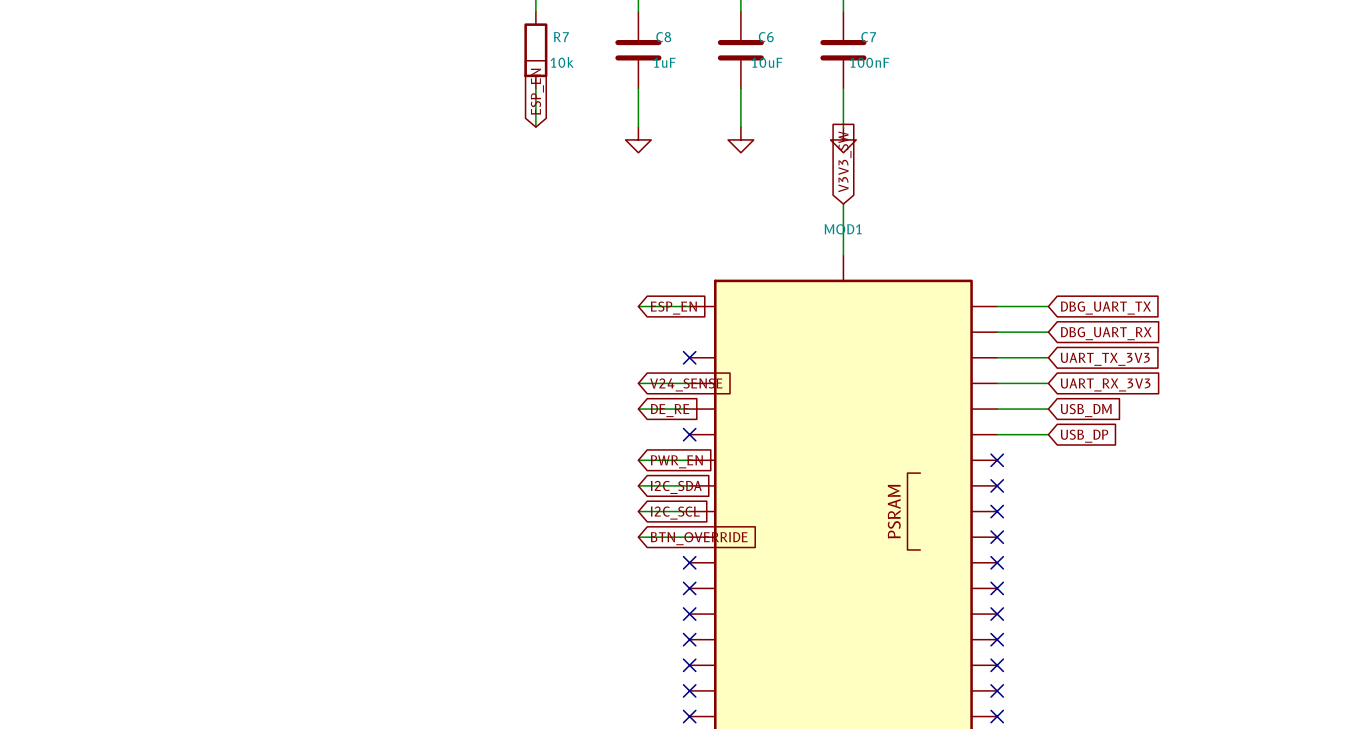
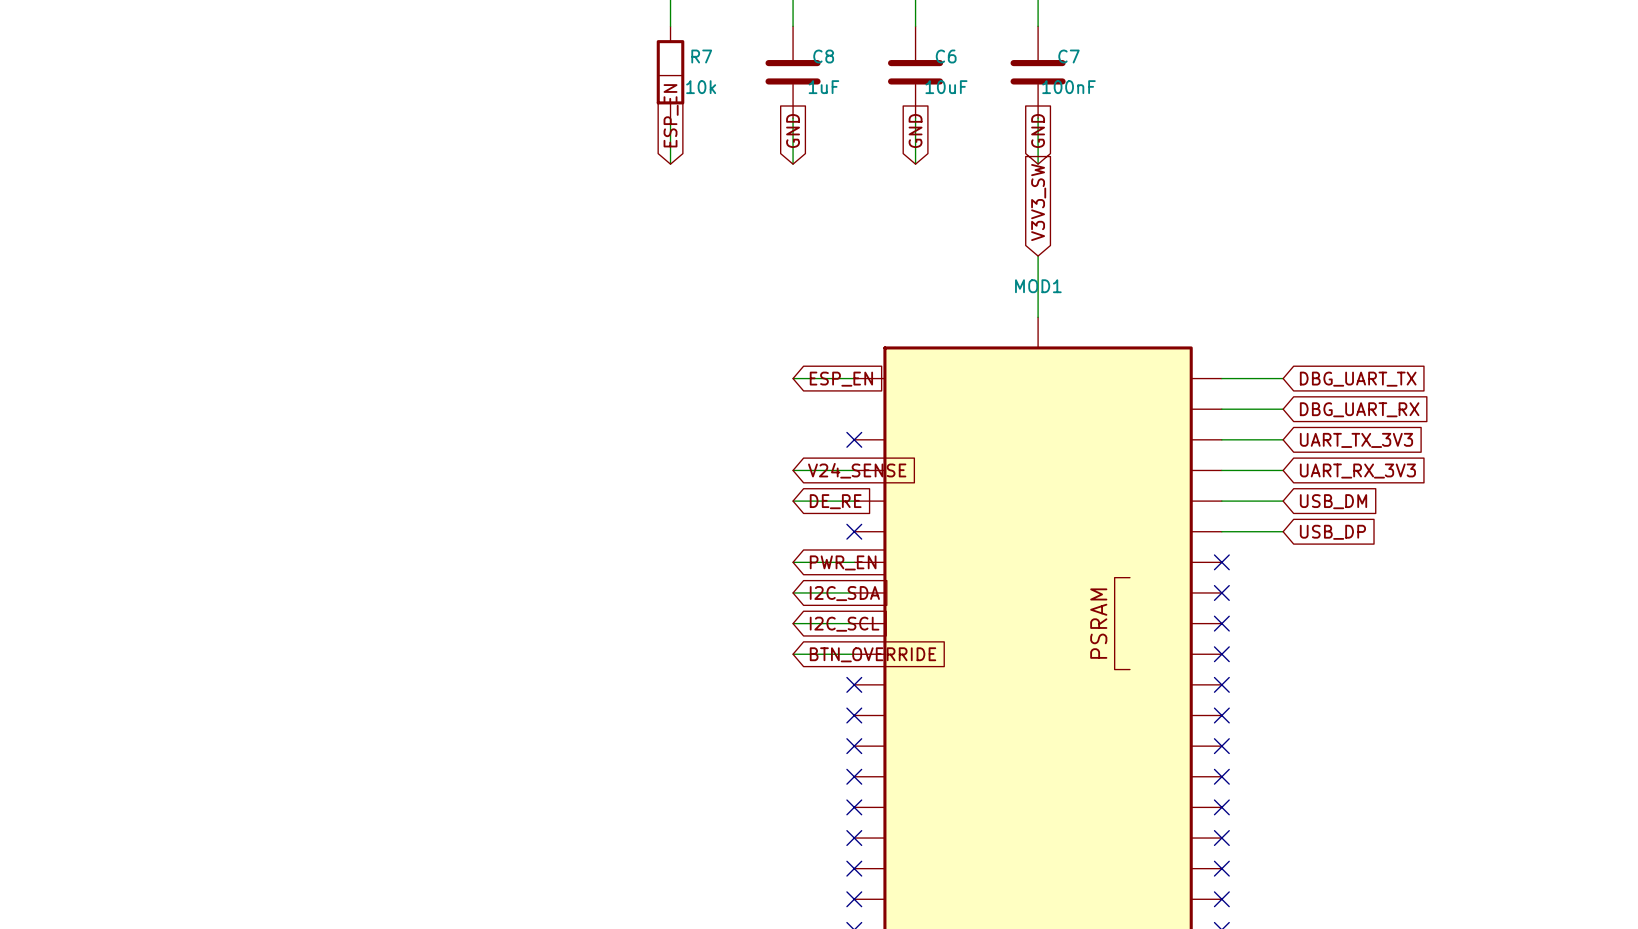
global label: none -> GND (793, 131)
global label: none -> GND (915, 131)
global label: none -> GND (1038, 131)
power symbol: (638, 139) -> none
power symbol: (740, 139) -> none
power symbol: (843, 139) -> none

